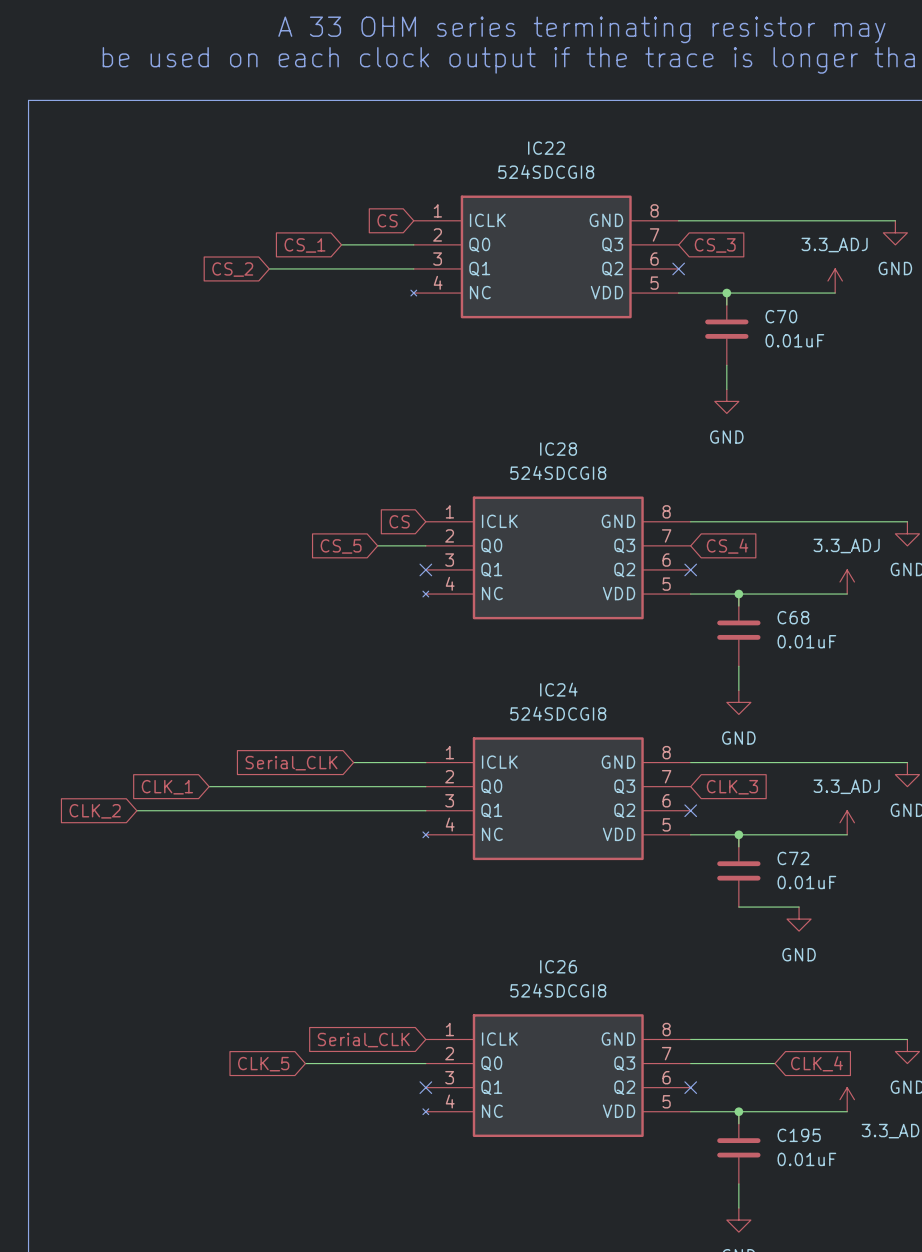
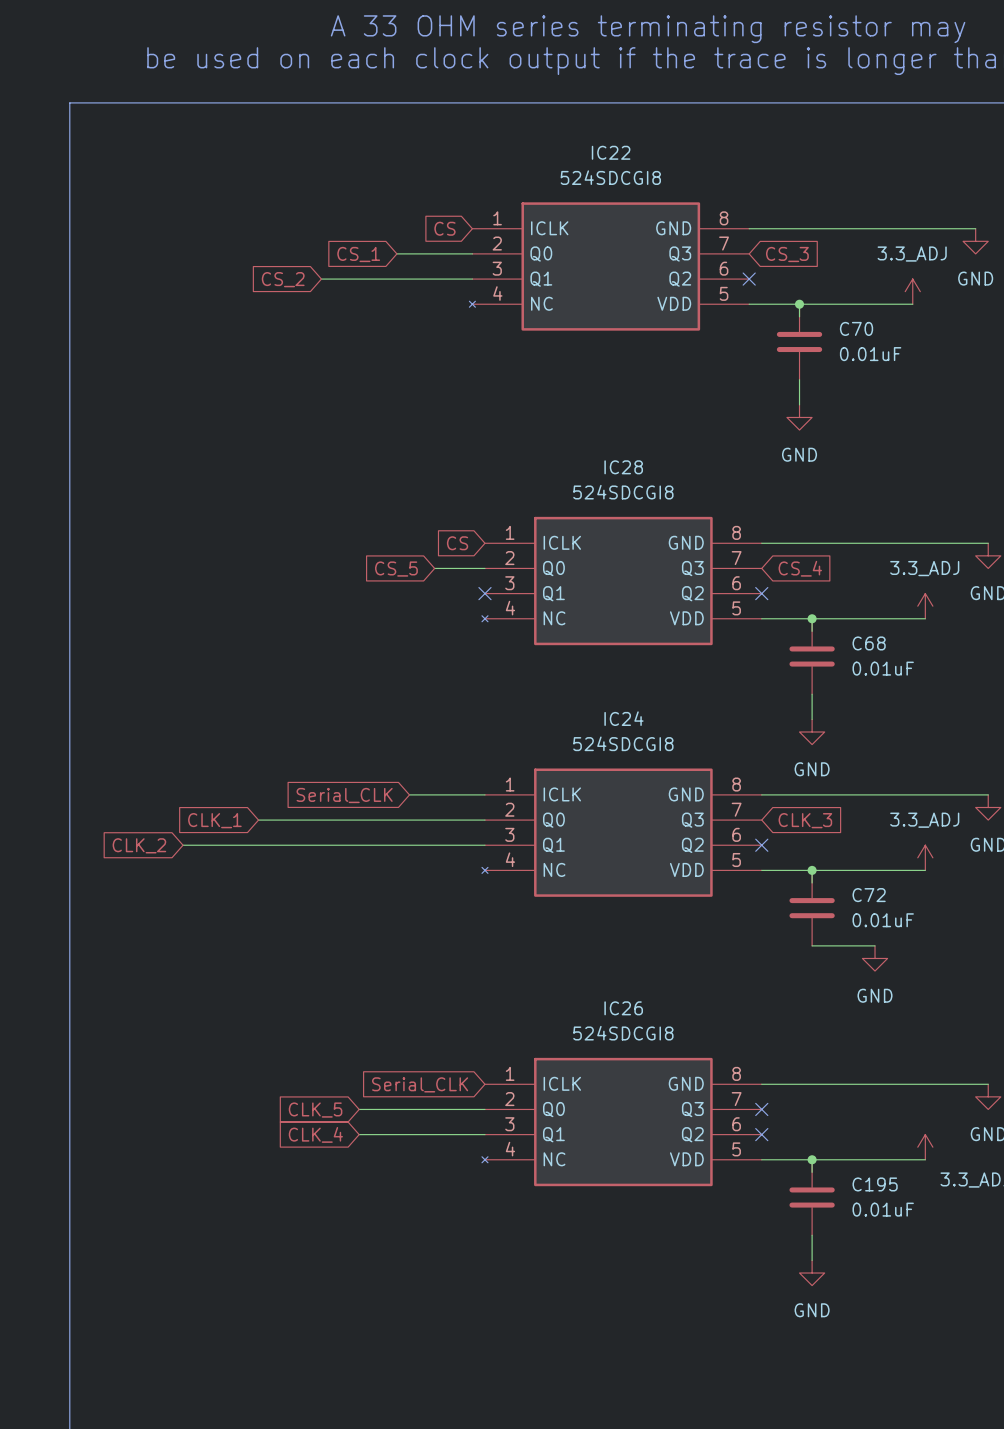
wire: (690, 1063) (774, 1063) -> none
no-connect mark: none -> (761, 1109)
global label: CLK_4 (816, 1063) -> none
global label: none -> CLK_4 (315, 1134)
wire: none -> (359, 1134) (484, 1134)
no-connect mark: (425, 1087) -> none

